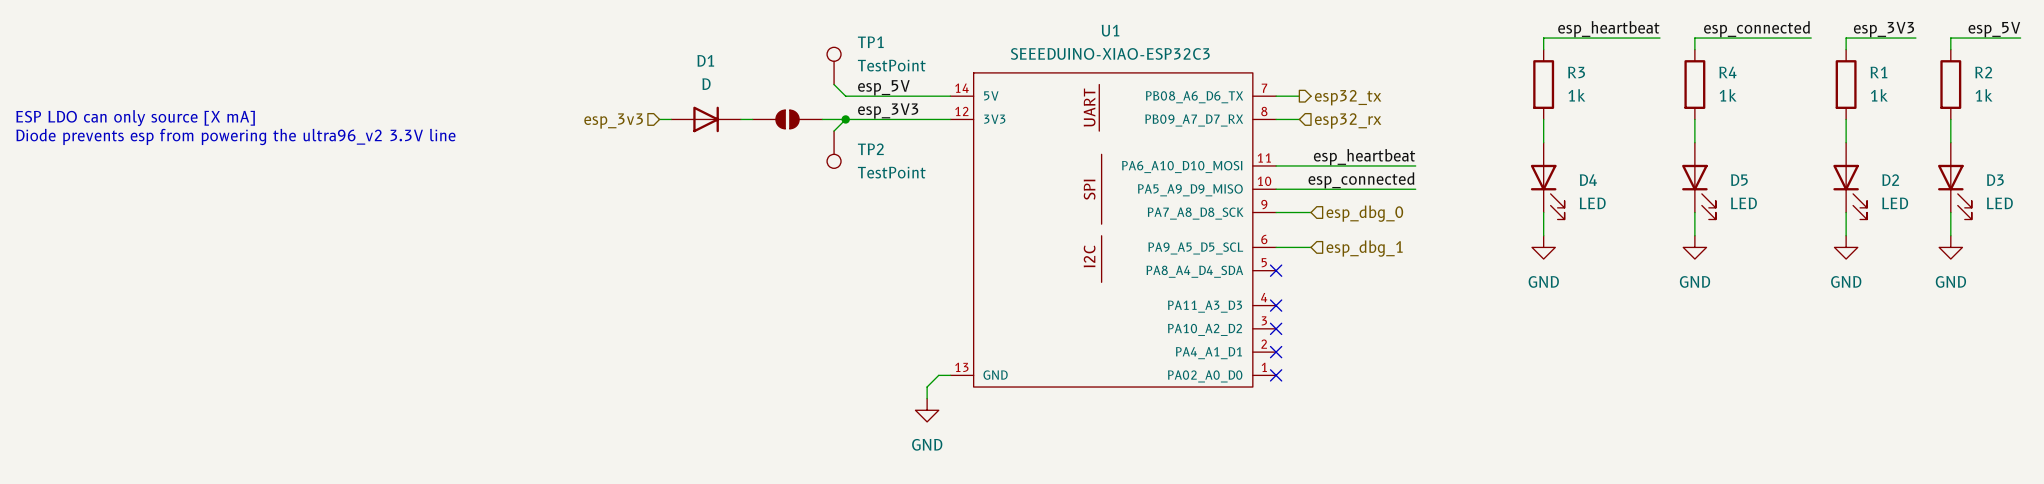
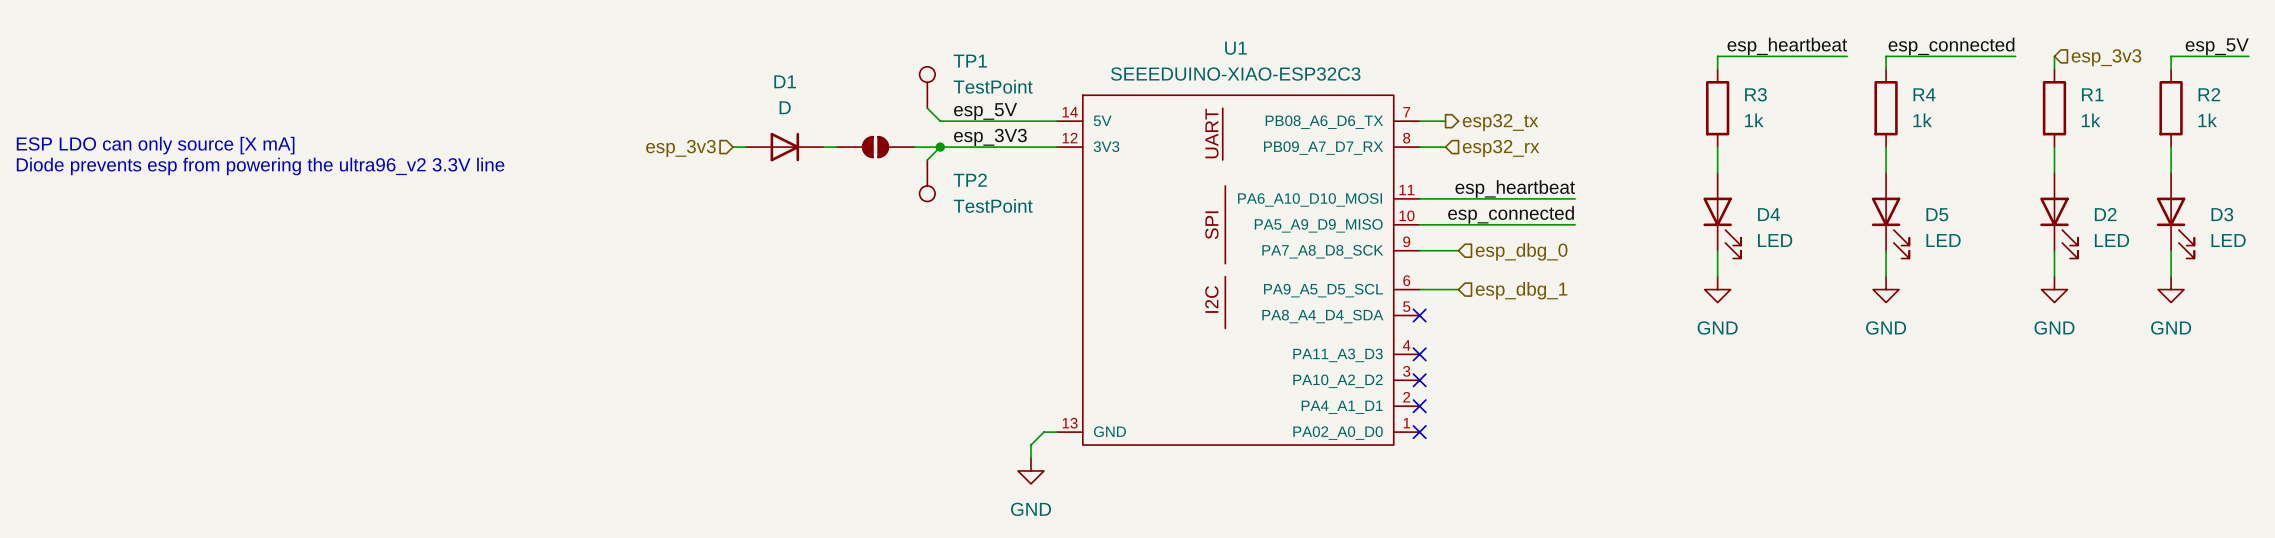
label: esp_3V3 (1883, 29) -> none
wire: (1846, 38) (1915, 38) -> none
hierarchical label: none -> esp_3v3 (2106, 57)

